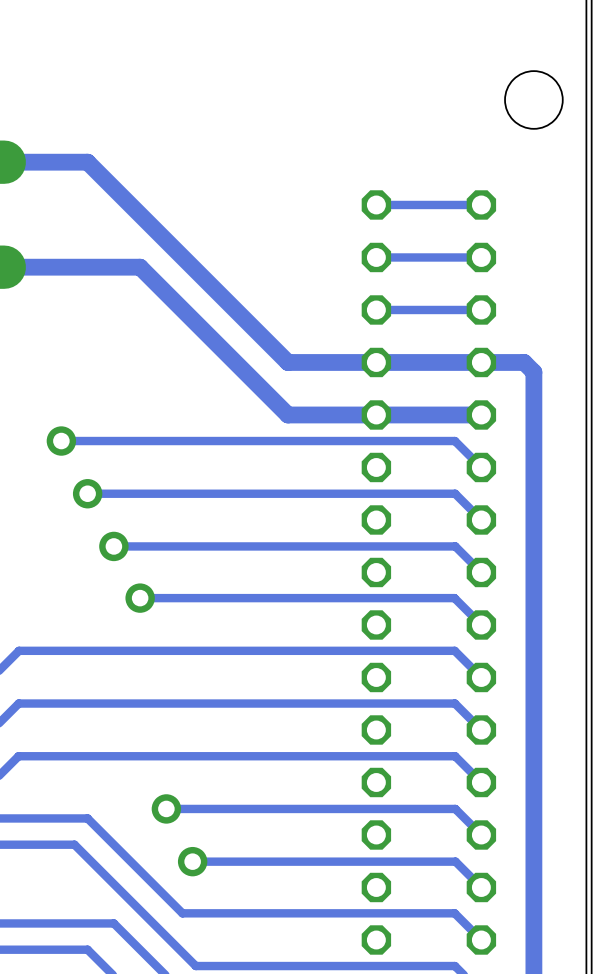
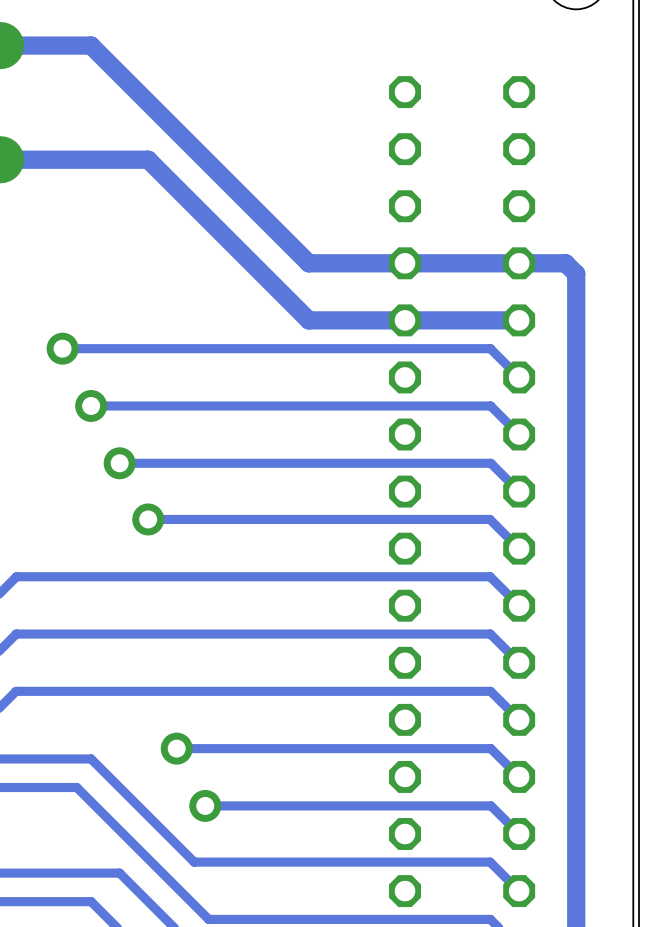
track: (481, 204) (376, 204) -> none
track: (481, 257) (376, 257) -> none
track: (481, 309) (376, 309) -> none

